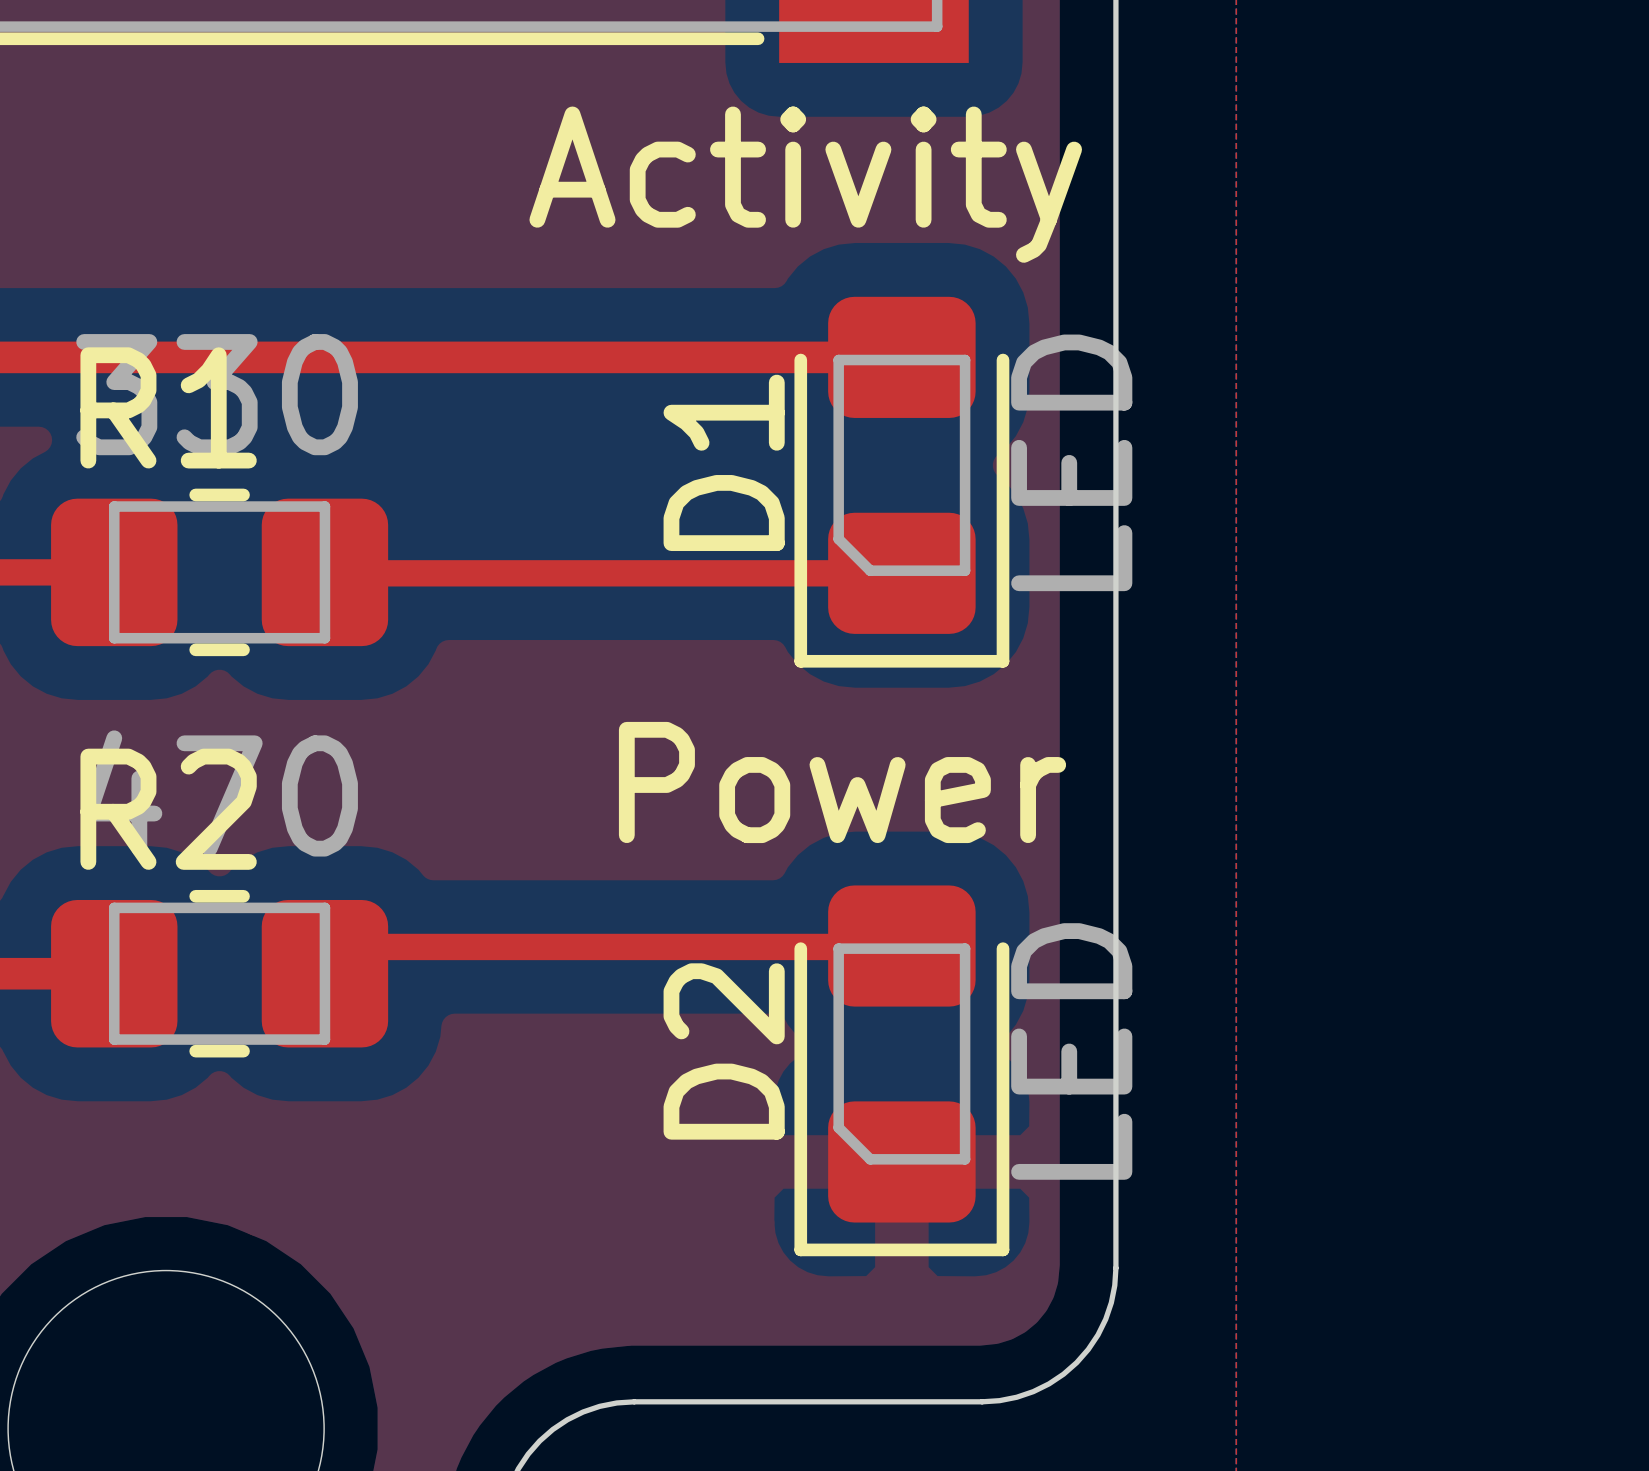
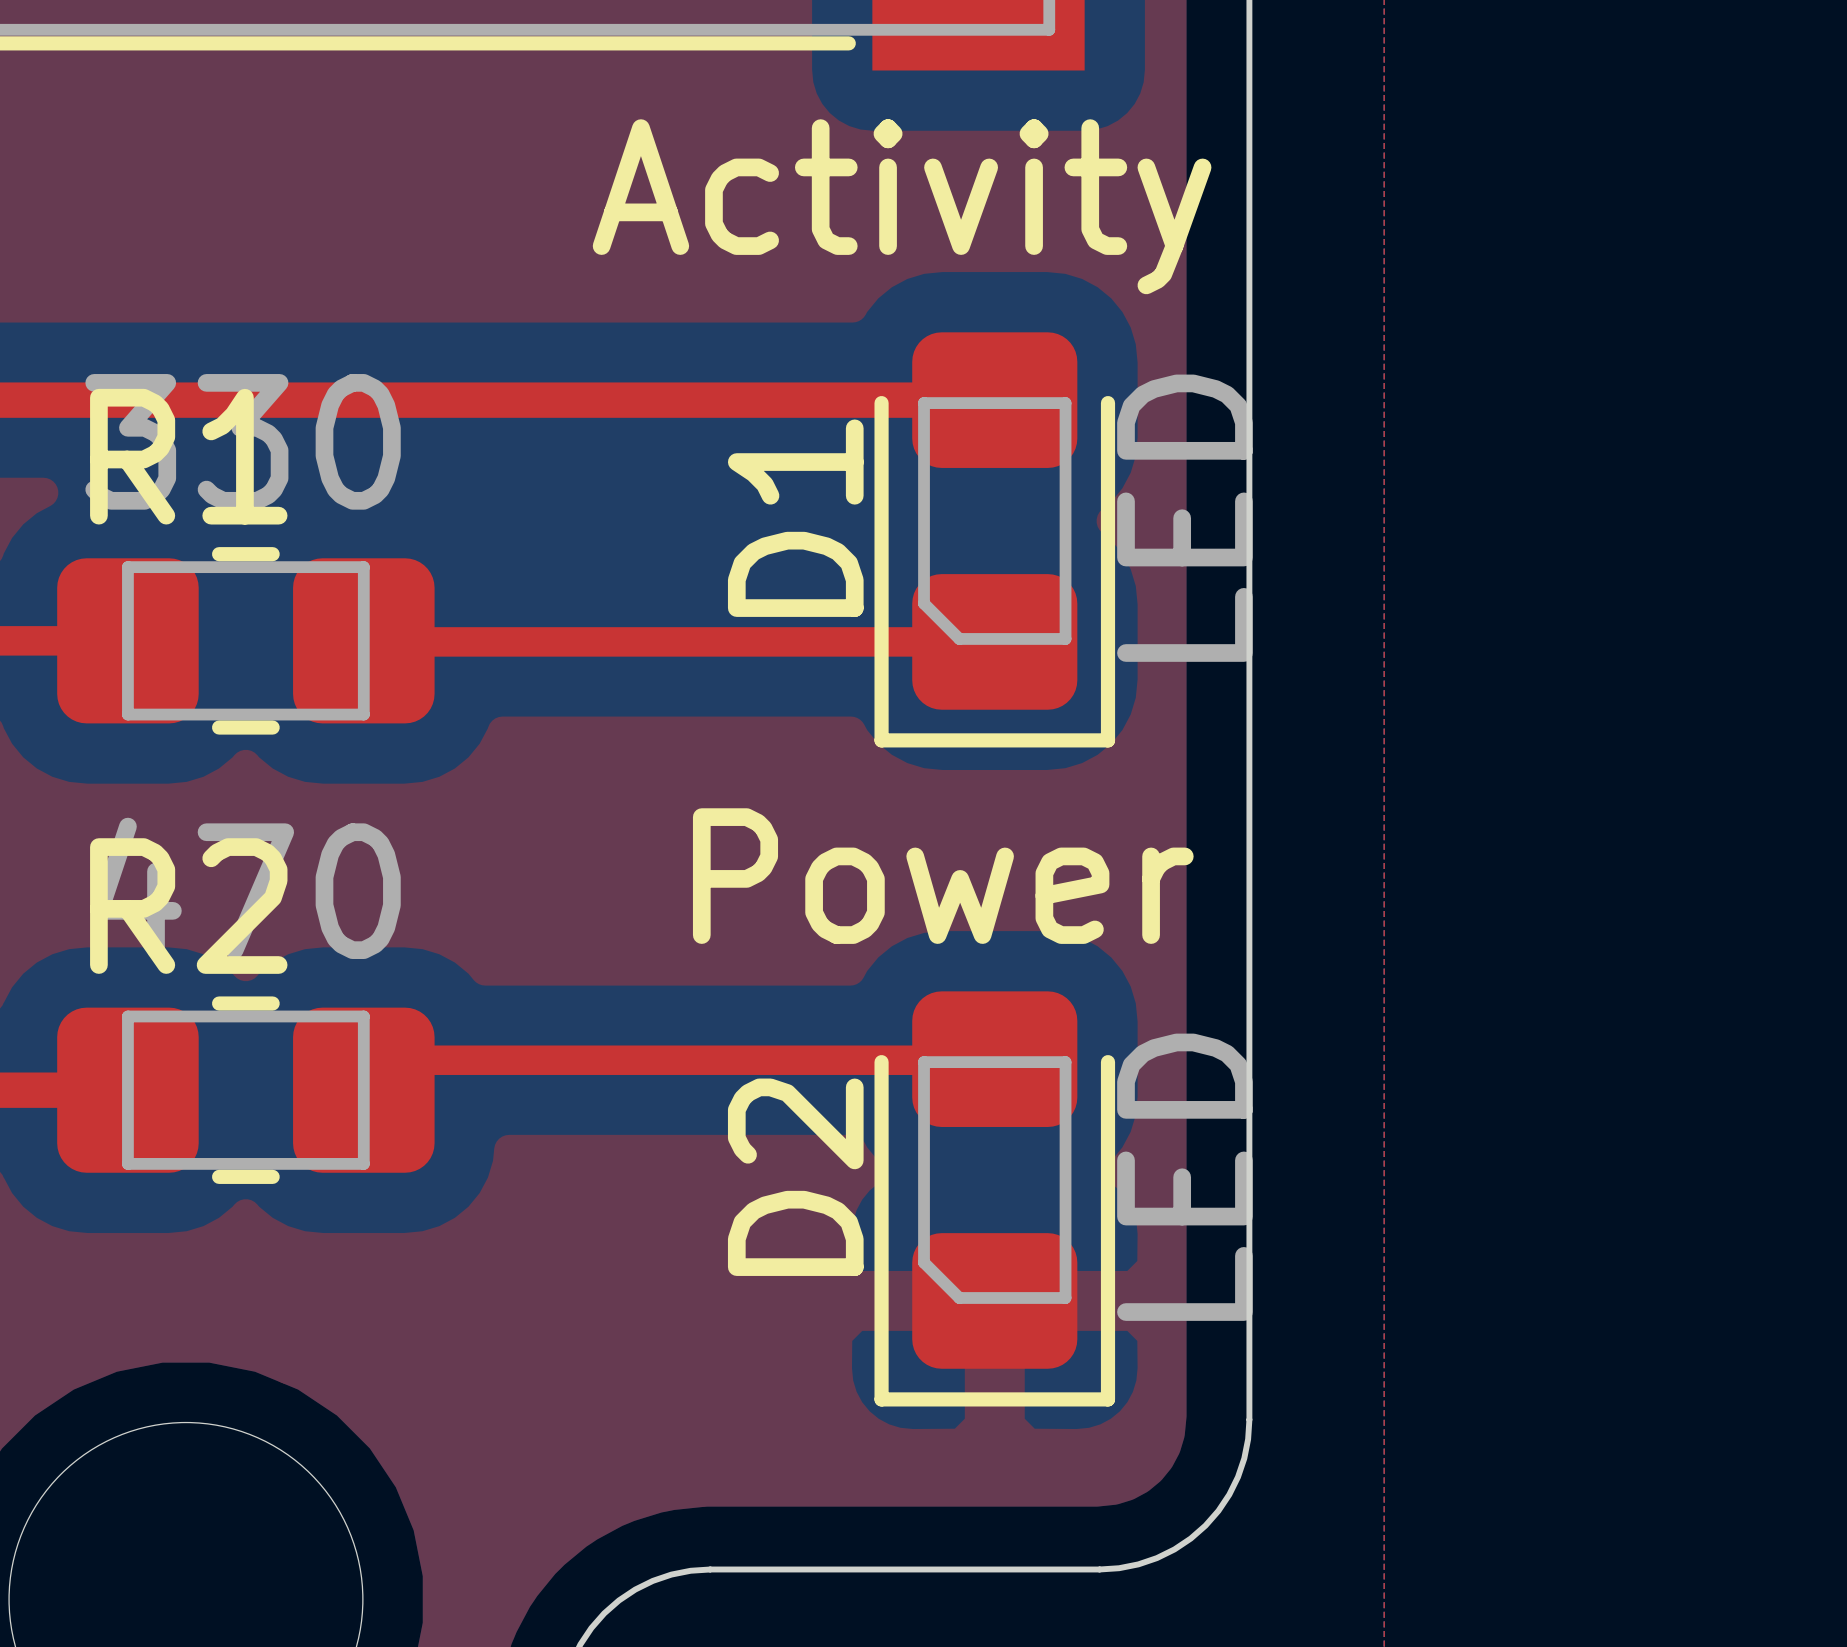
D1 position: (901, 482) -> (994, 539)
D2 position: (901, 1070) -> (994, 1198)

